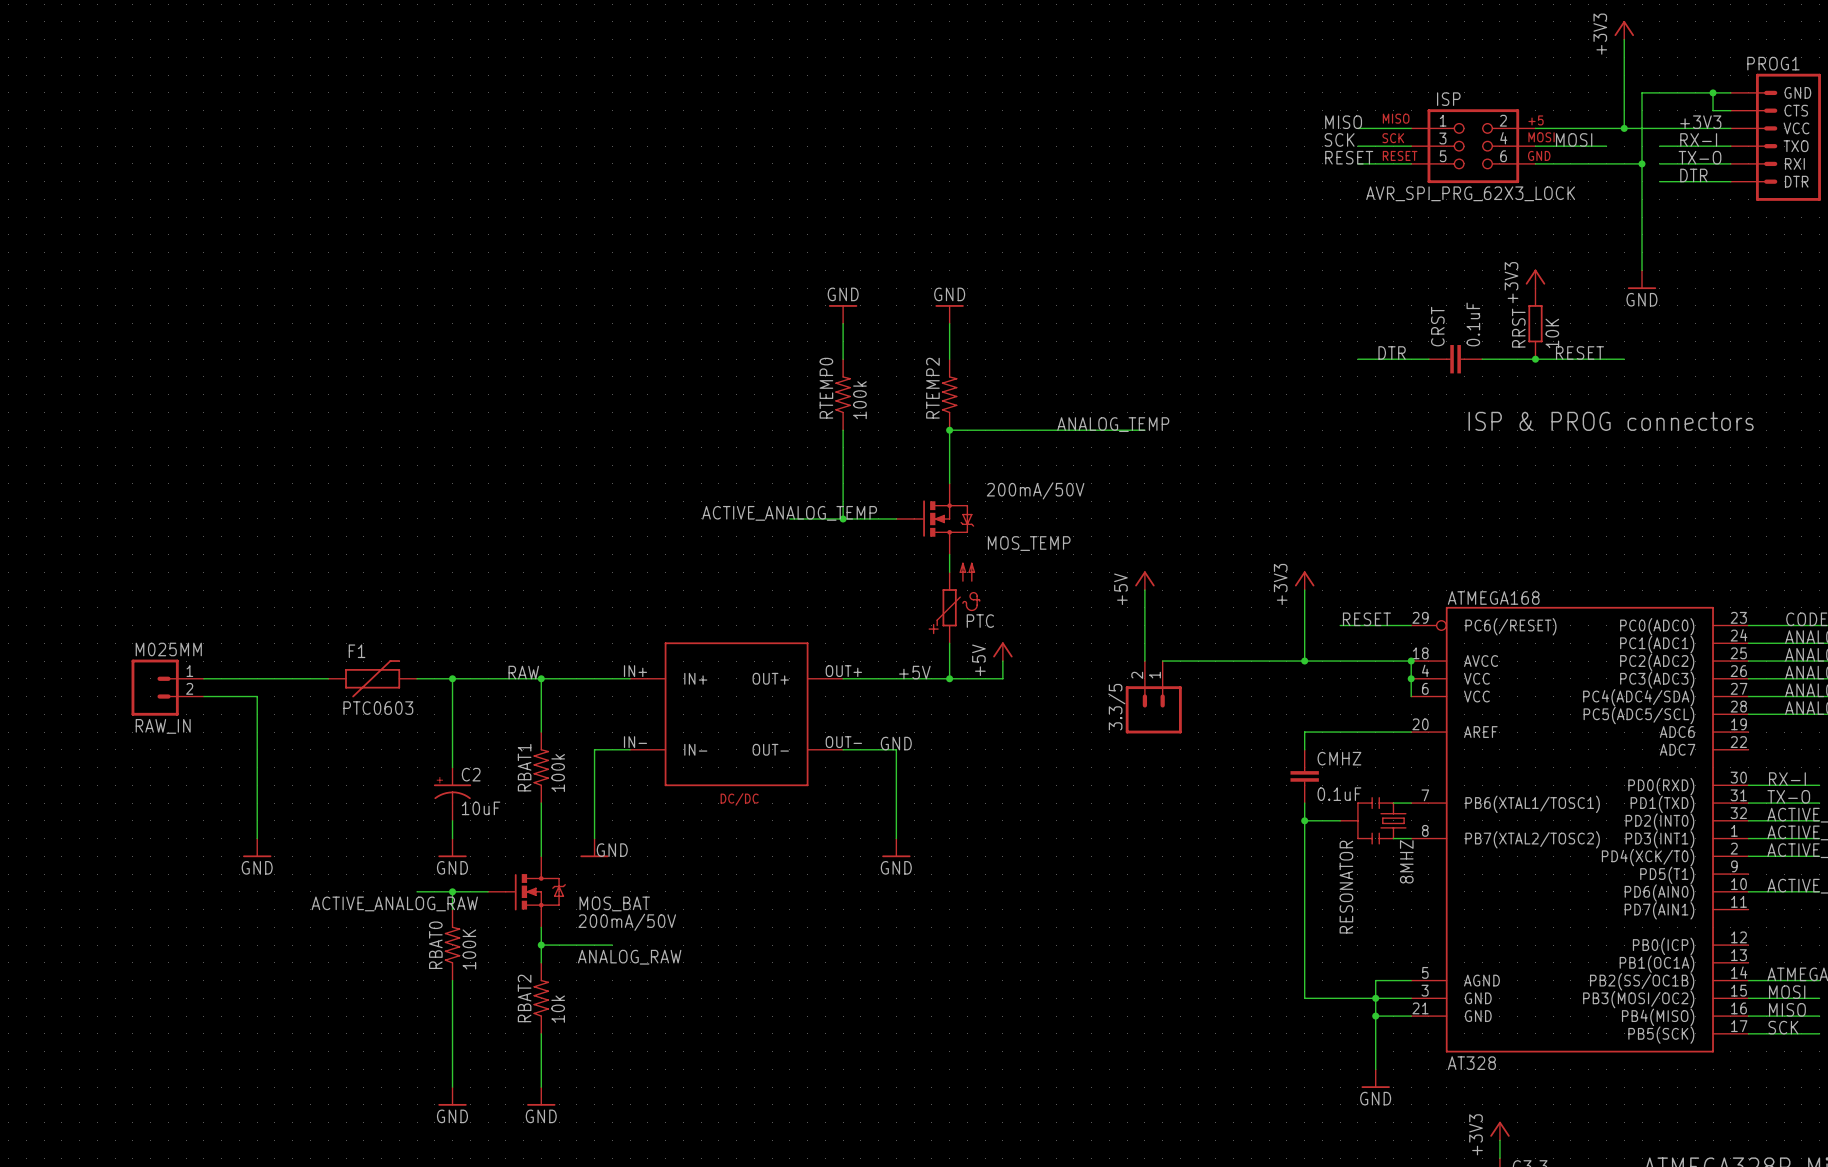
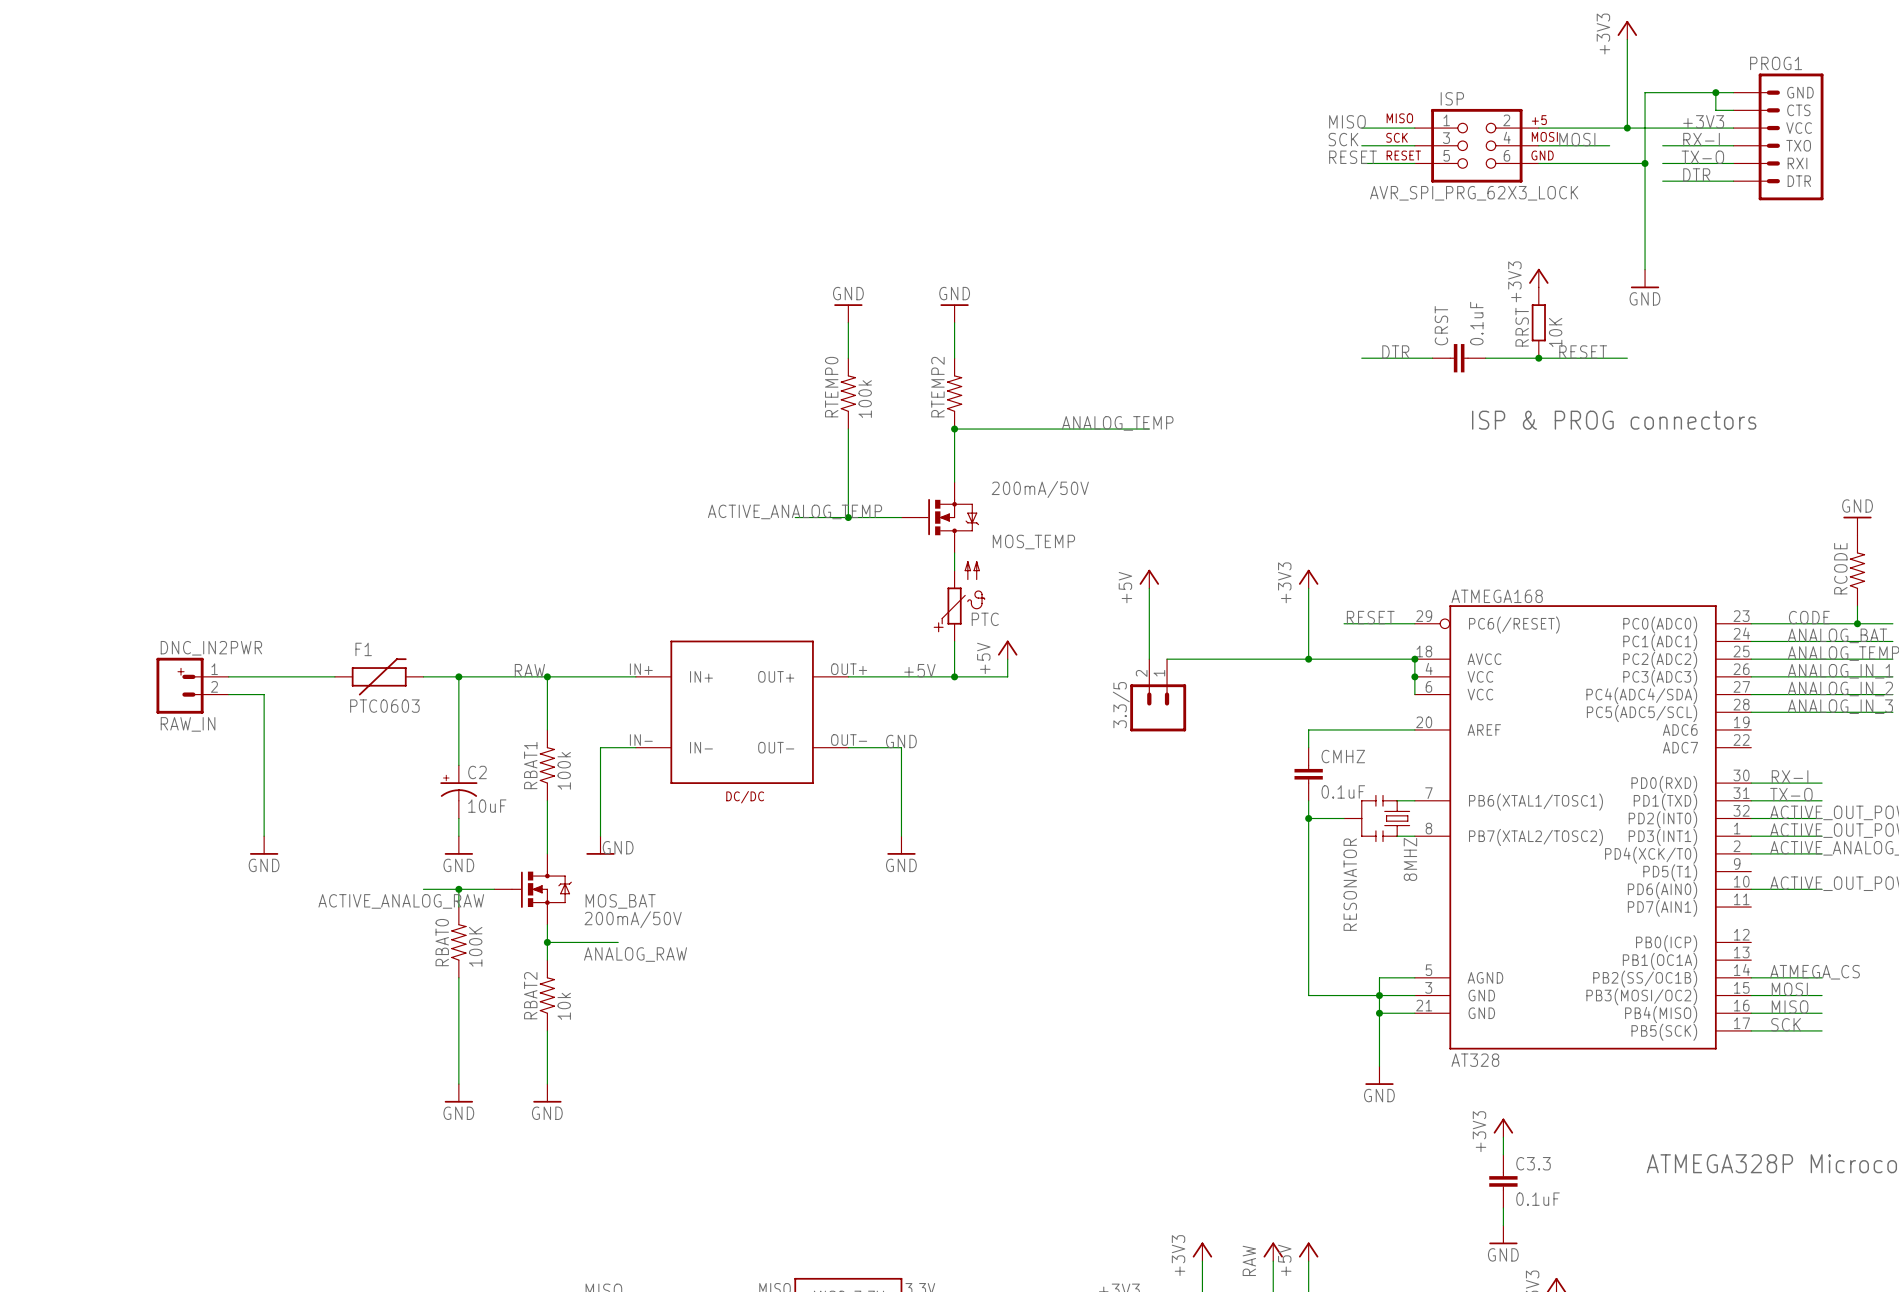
RAW_IN: M025MM (167, 687) -> none
RAW_IN: none -> DNC_IN2PWR (192, 685)

